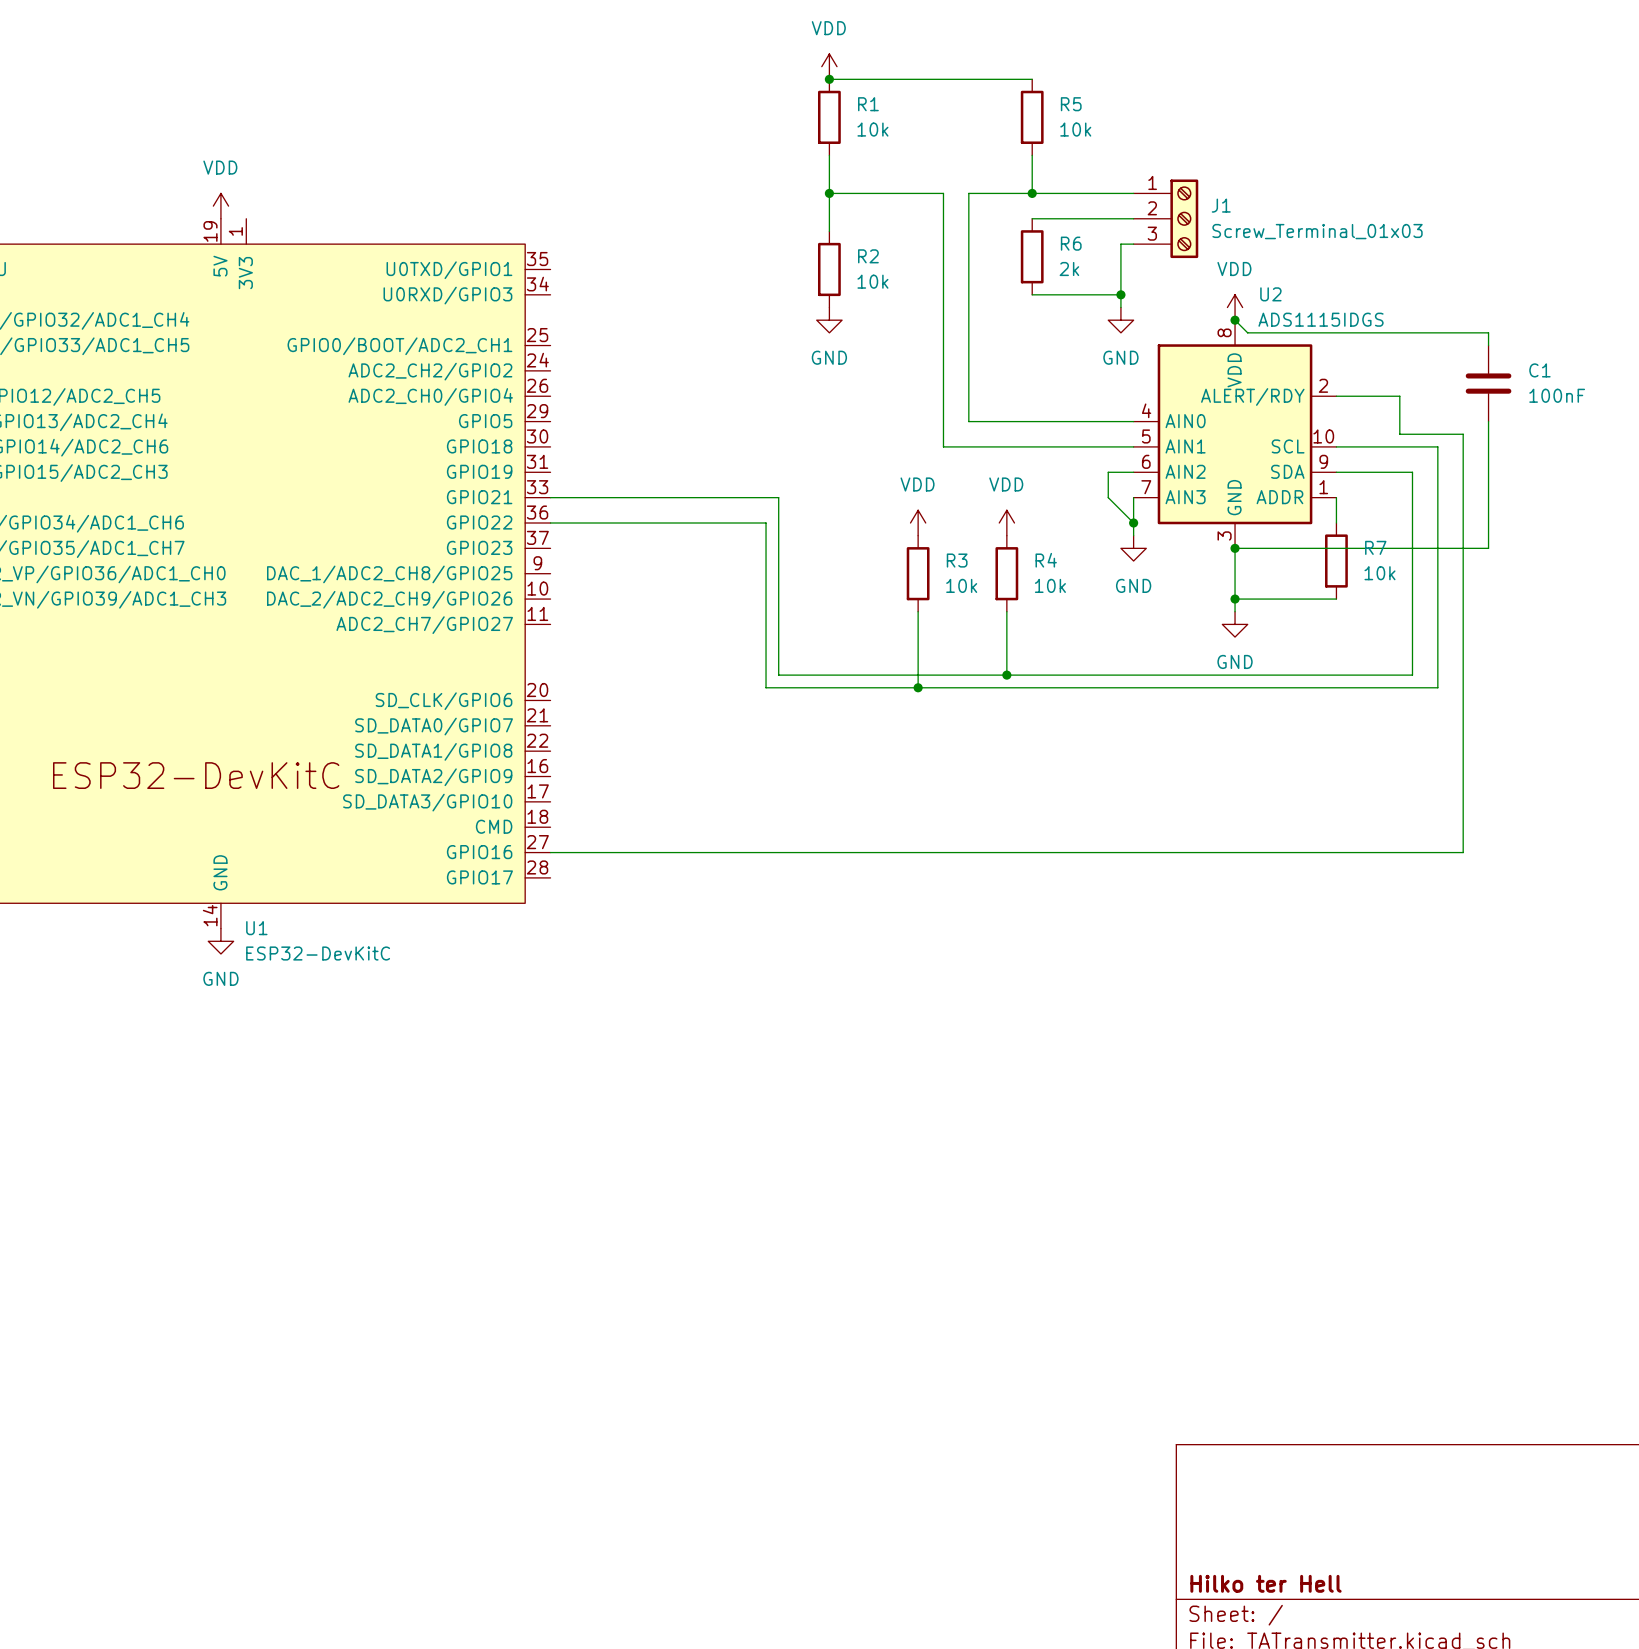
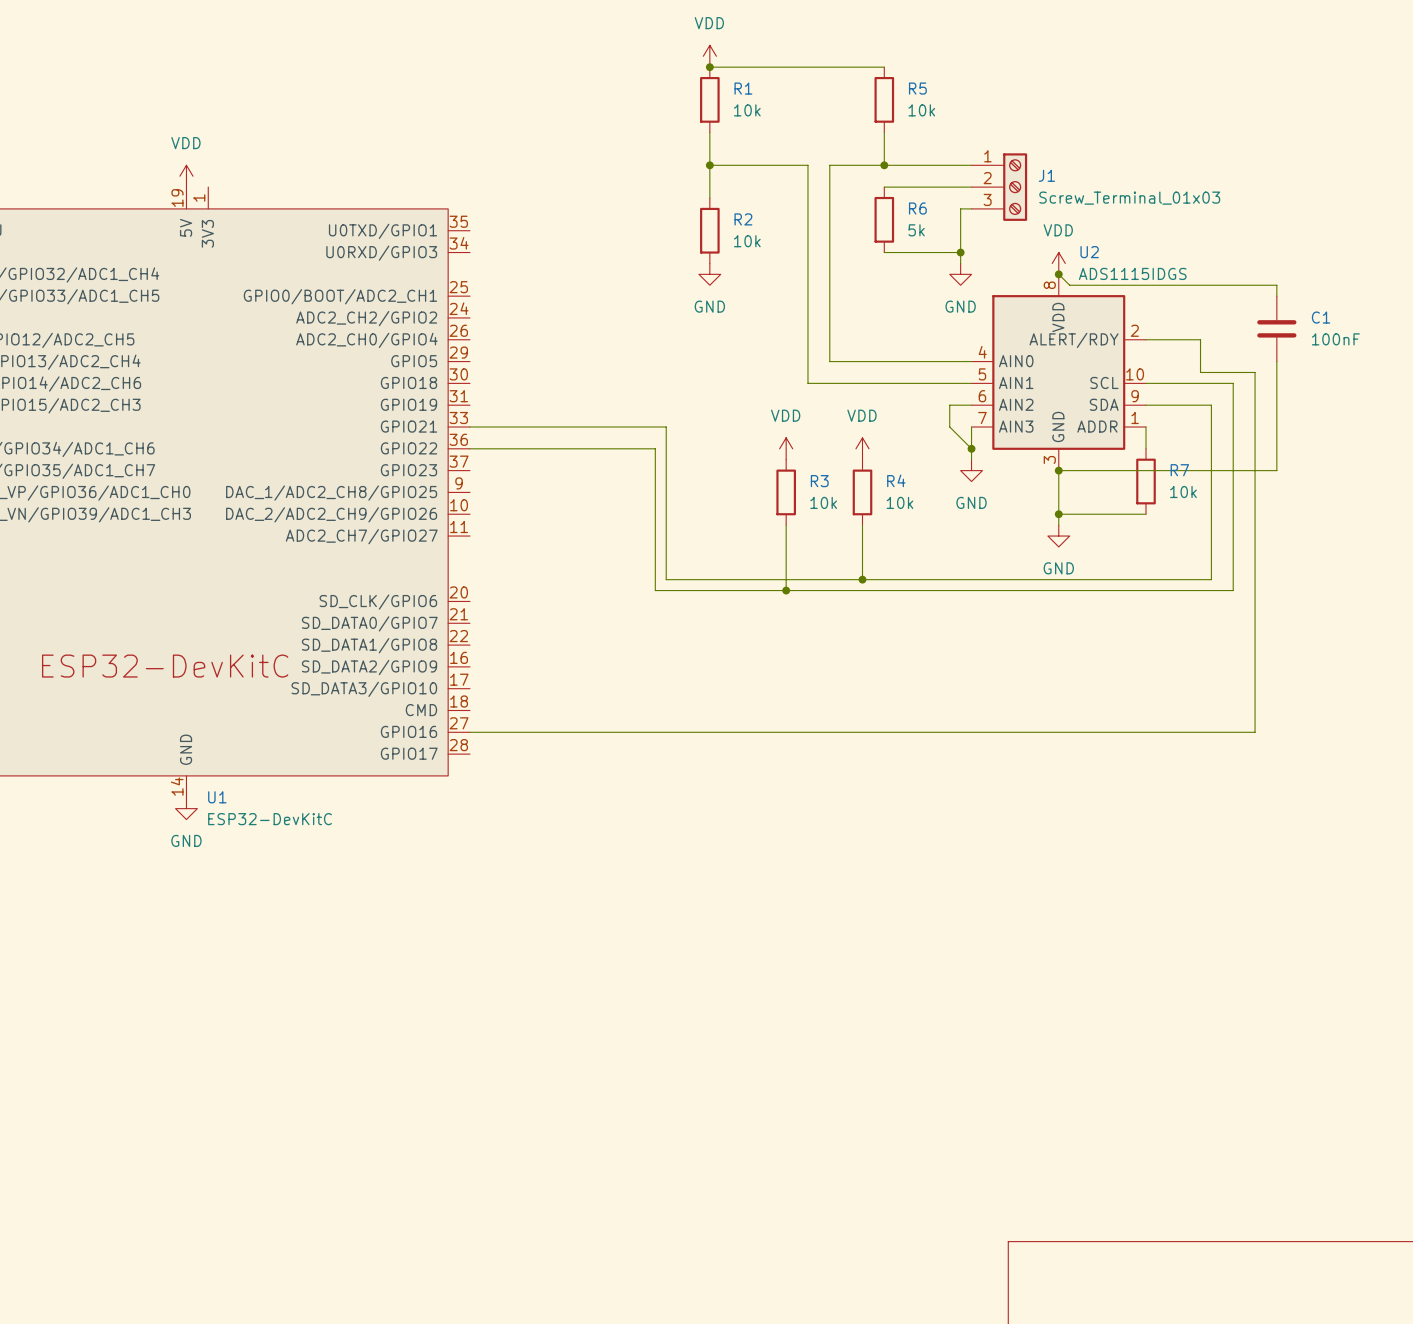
R6 value: 2k (1069, 269) -> 5k (916, 230)

